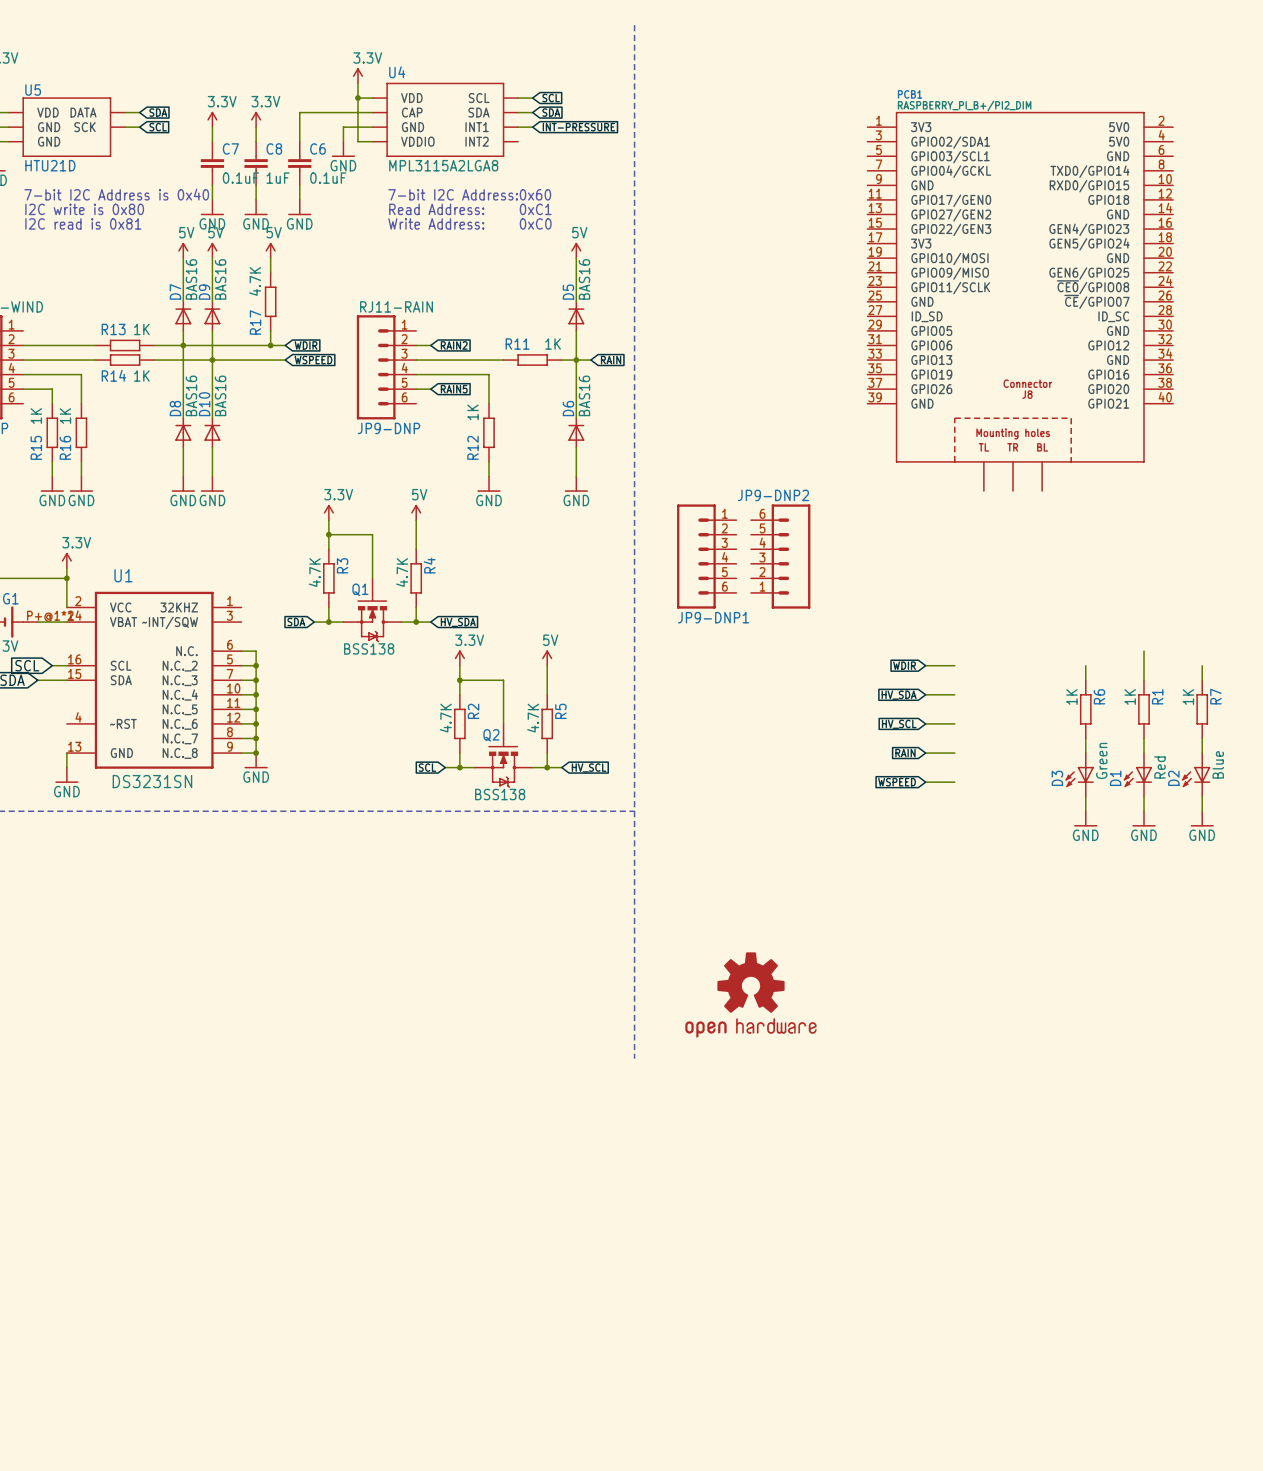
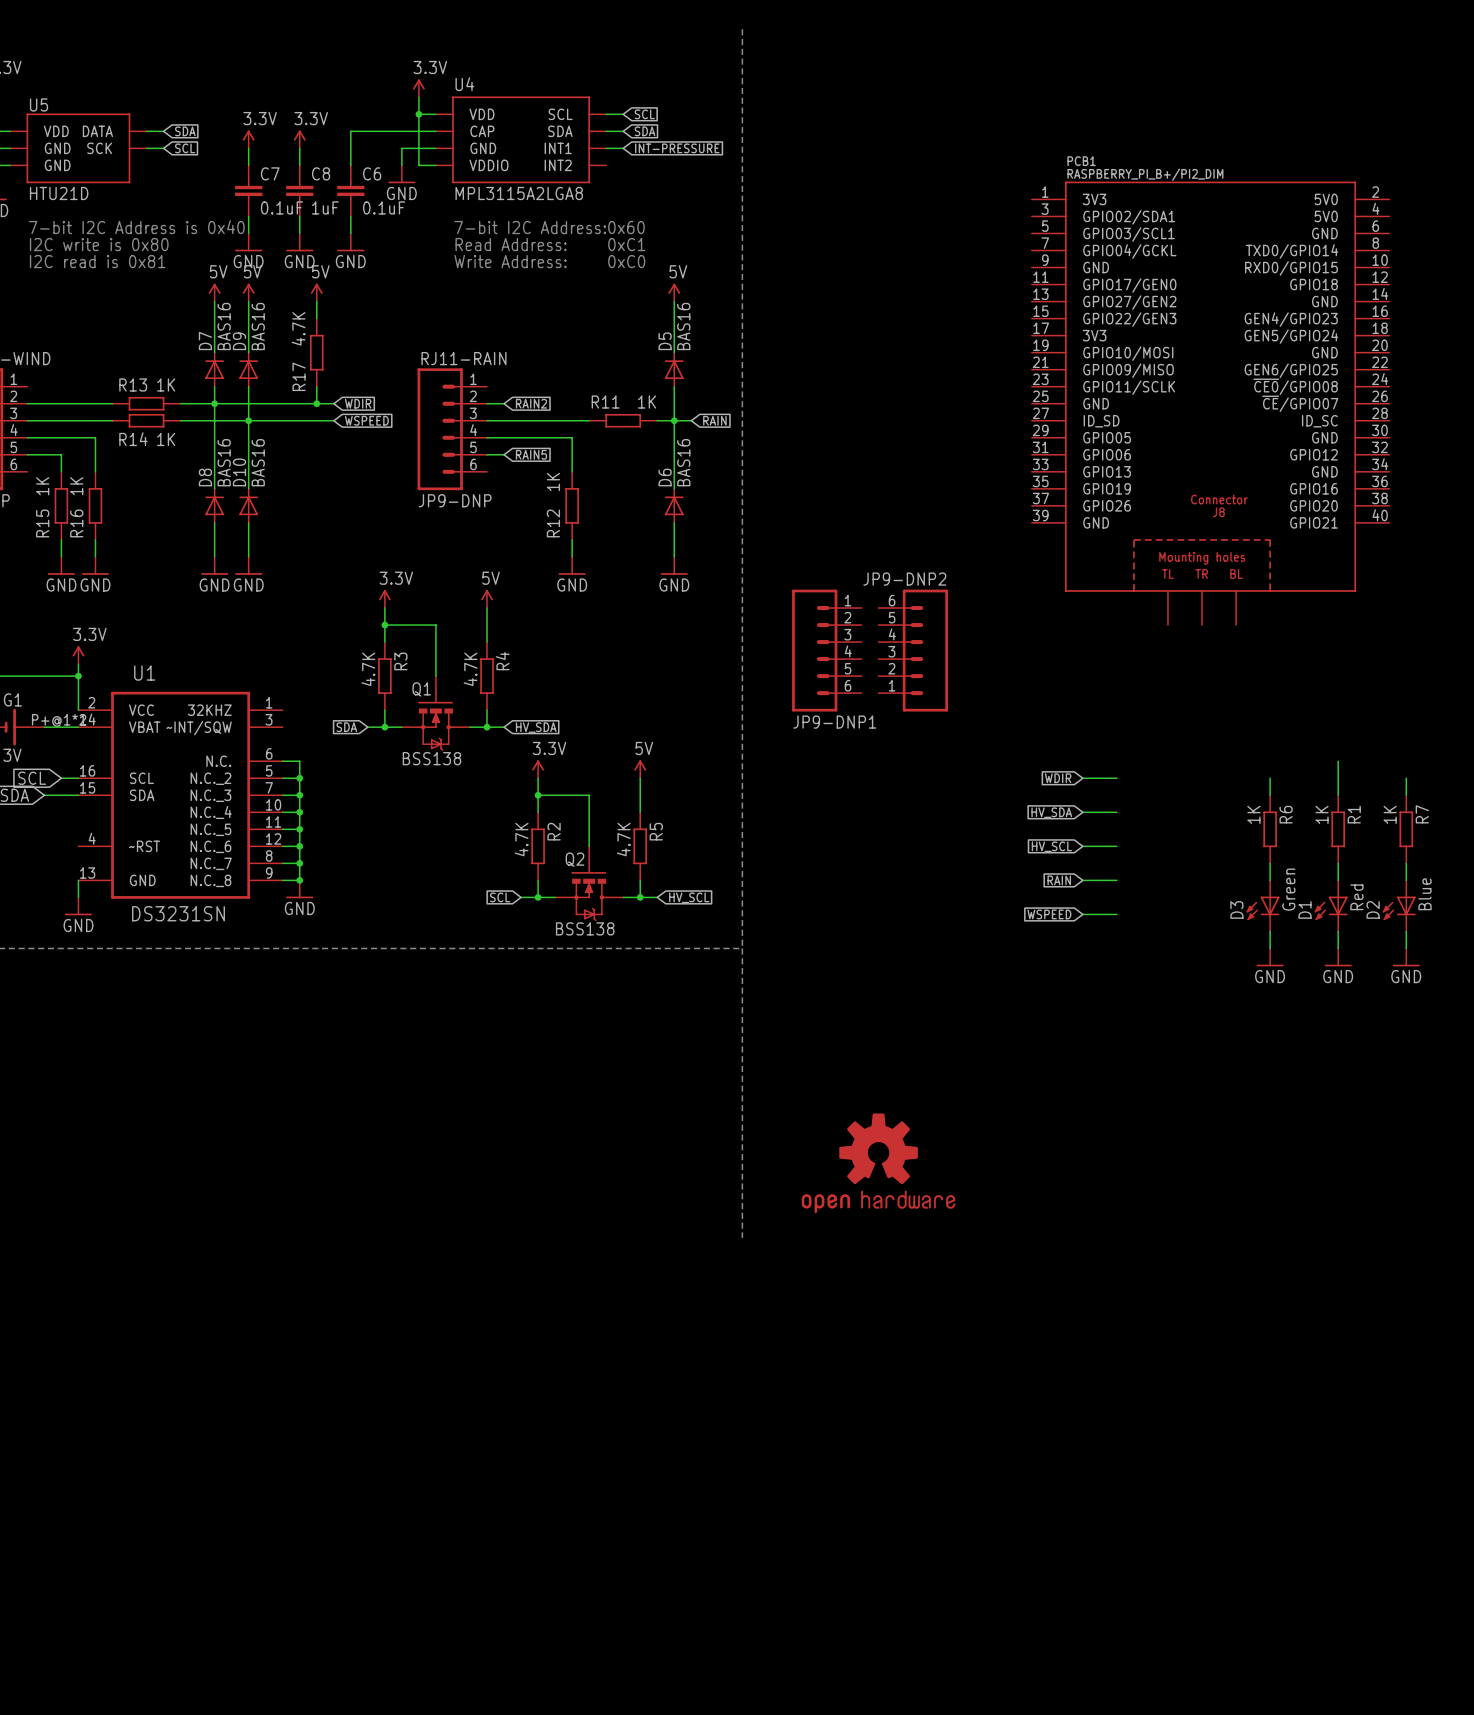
PCB1 position: (1020, 301) -> (1210, 403)

